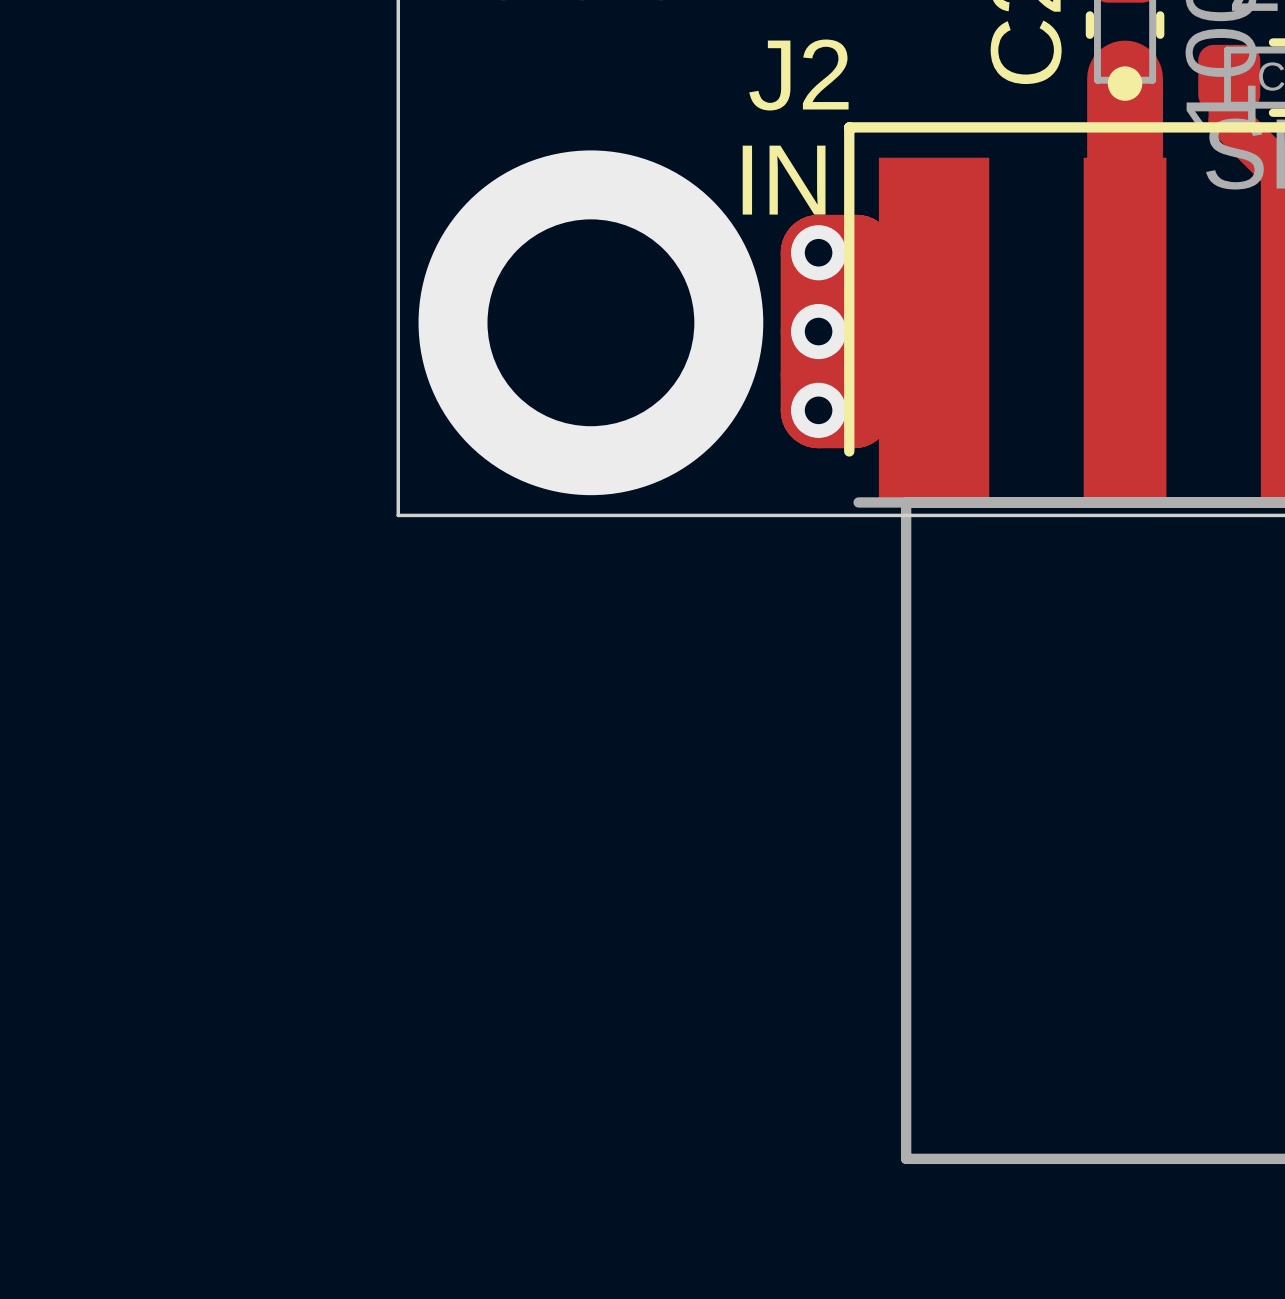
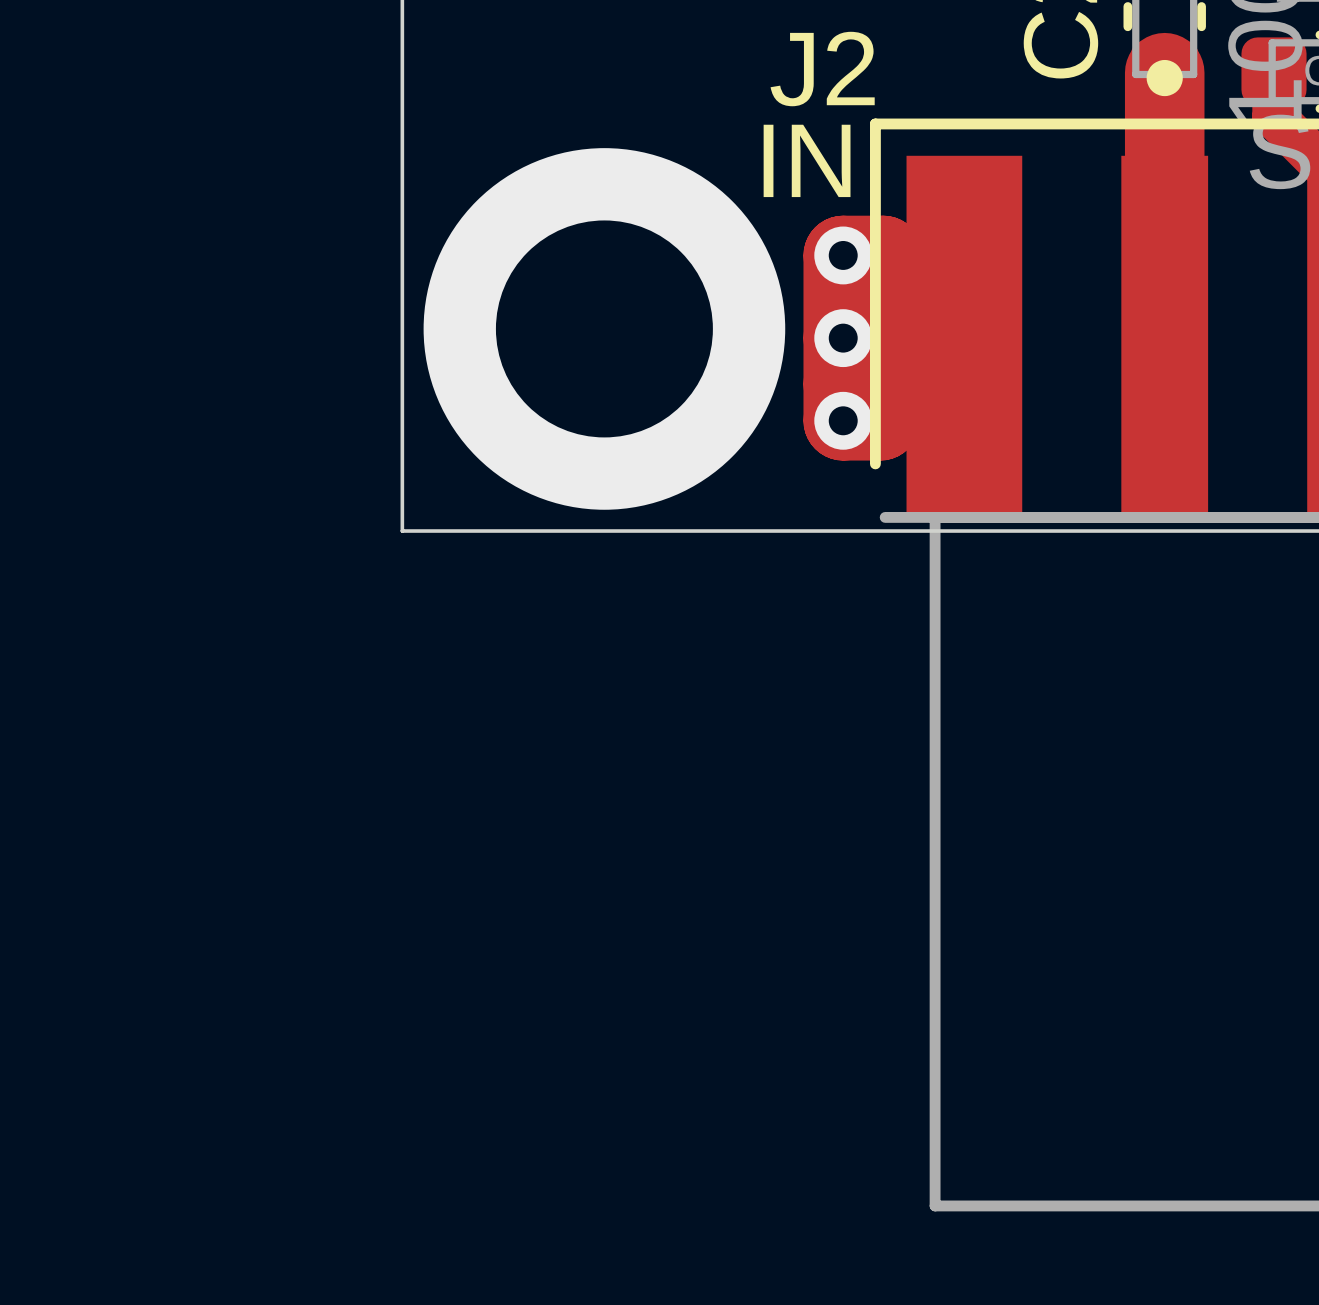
text position: IN (784, 180) -> IN (807, 160)

